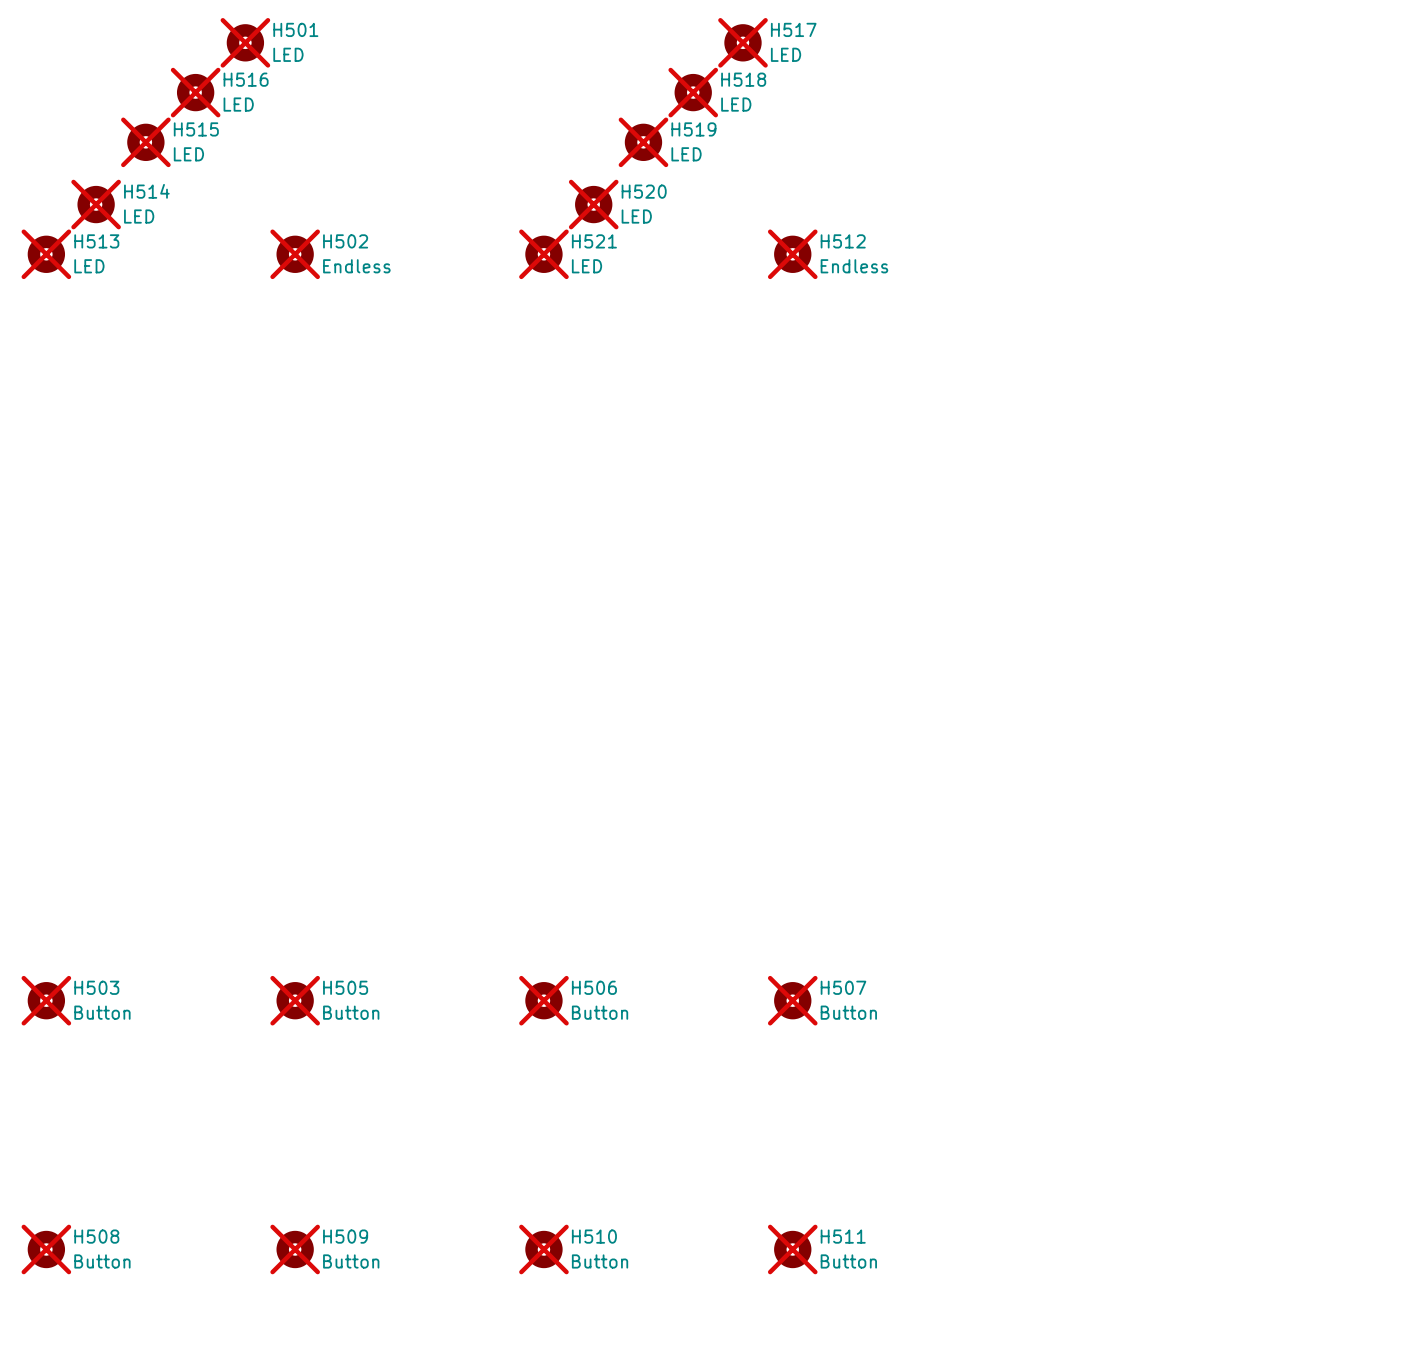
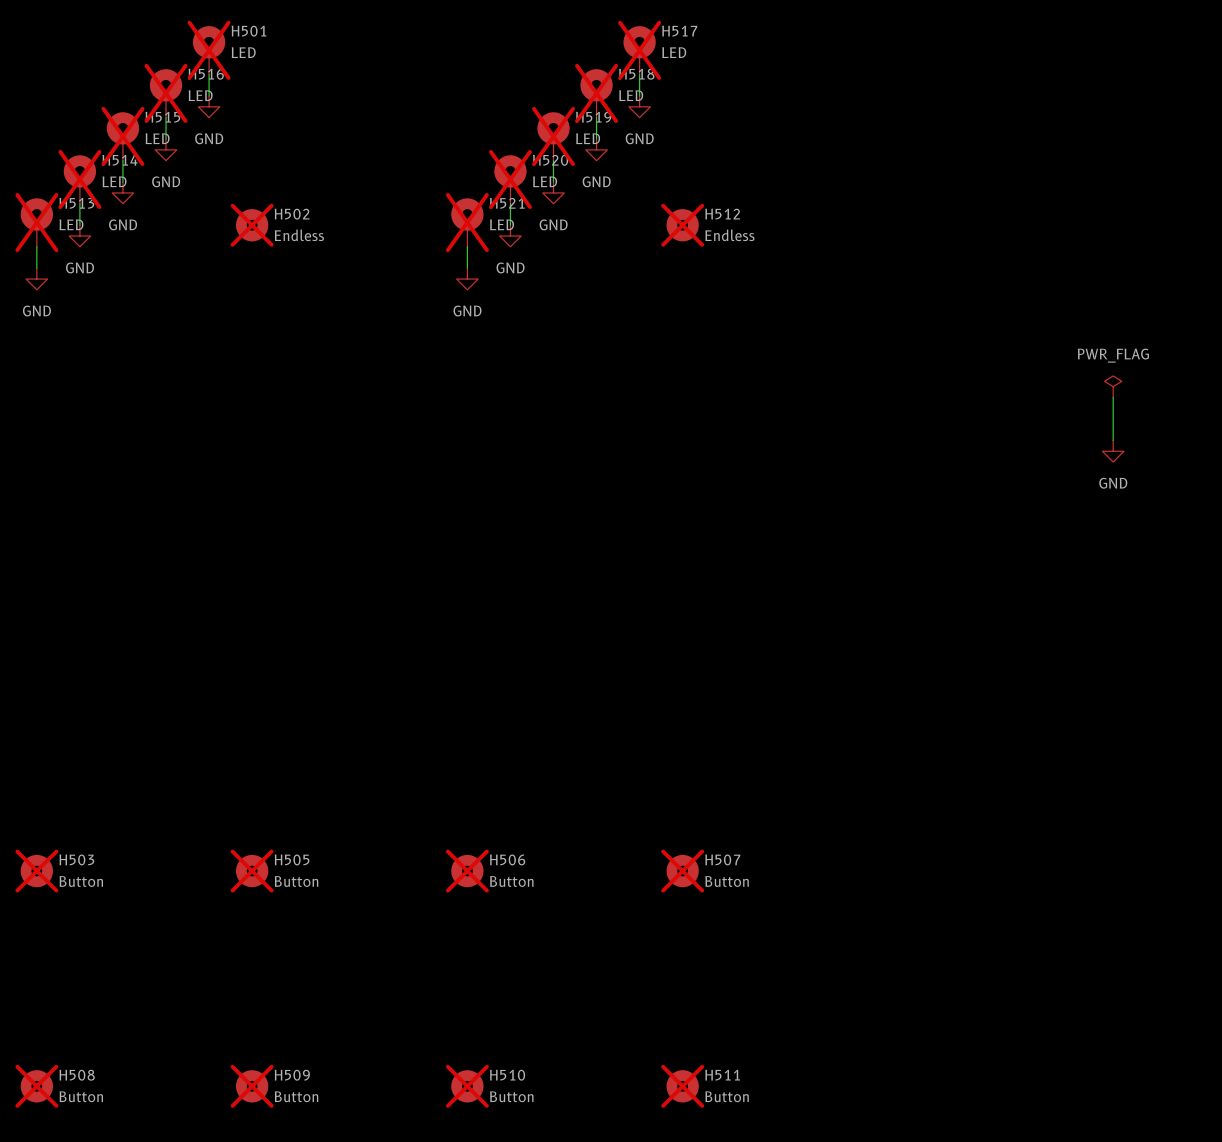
H501 symbol: [226, 24, 265, 62] -> [192, 26, 226, 75]
H517 symbol: [724, 24, 762, 62] -> [623, 26, 656, 75]
H516 symbol: [176, 73, 215, 112] -> [149, 69, 183, 118]
H518 symbol: [674, 73, 712, 112] -> [580, 69, 613, 118]
wire: none -> (209, 74) (209, 96)
wire: none -> (639, 74) (639, 96)
power symbol: none -> GND (209, 106)
power symbol: none -> GND (639, 106)
H515 symbol: [127, 123, 165, 162] -> [106, 112, 140, 161]
H519 symbol: [624, 123, 663, 162] -> [537, 112, 570, 161]
wire: none -> (166, 117) (166, 139)
wire: none -> (596, 117) (596, 139)
power symbol: none -> GND (166, 149)
power symbol: none -> GND (596, 149)
wire: none -> (122, 160) (122, 182)
wire: none -> (553, 160) (553, 182)
H514 symbol: [77, 185, 115, 224] -> [63, 155, 97, 204]
H520 symbol: [575, 185, 613, 224] -> [494, 155, 527, 204]
power symbol: none -> GND (122, 192)
power symbol: none -> GND (553, 192)
wire: none -> (79, 203) (79, 225)
wire: none -> (510, 203) (510, 225)
H513 symbol: [27, 235, 66, 273] -> [20, 198, 54, 247]
H521 symbol: [525, 235, 563, 273] -> [451, 198, 484, 247]
power symbol: none -> GND (79, 236)
power symbol: none -> GND (510, 236)
wire: none -> (36, 246) (36, 268)
wire: none -> (467, 246) (467, 268)
power symbol: none -> GND (36, 279)
power symbol: none -> GND (467, 279)
power symbol: none -> PWR_FLAG (1113, 386)
wire: none -> (1113, 397) (1113, 440)
power symbol: none -> GND (1113, 451)

